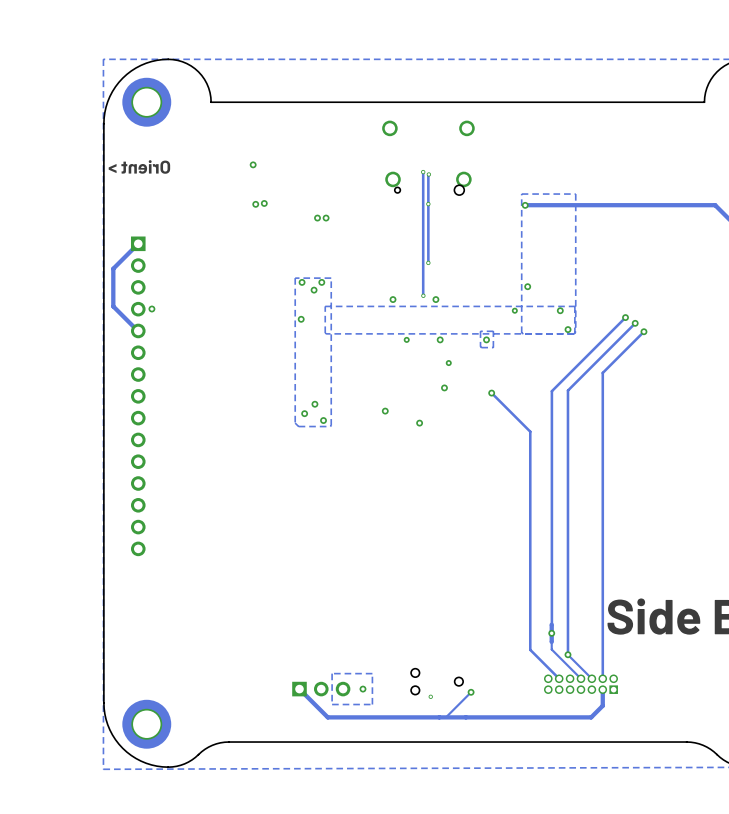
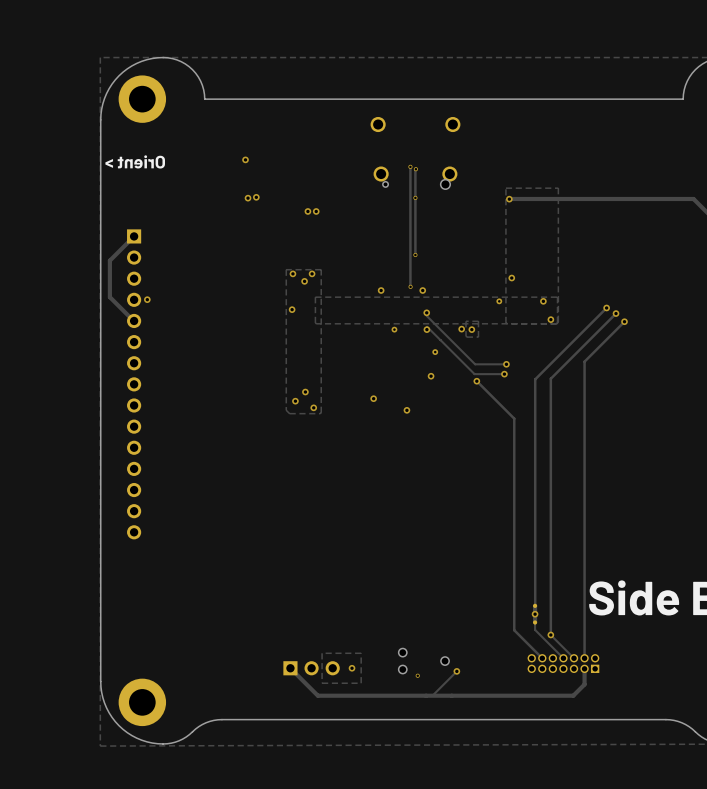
track: none -> (426, 312) (426, 315) (475, 364) (506, 364)
via: none -> (426, 312)
track: none -> (427, 326) (440, 340)
via: none -> (461, 329)
track: none -> (440, 340) (474, 374) (504, 374)
via: none -> (506, 364)
via: none -> (504, 374)

